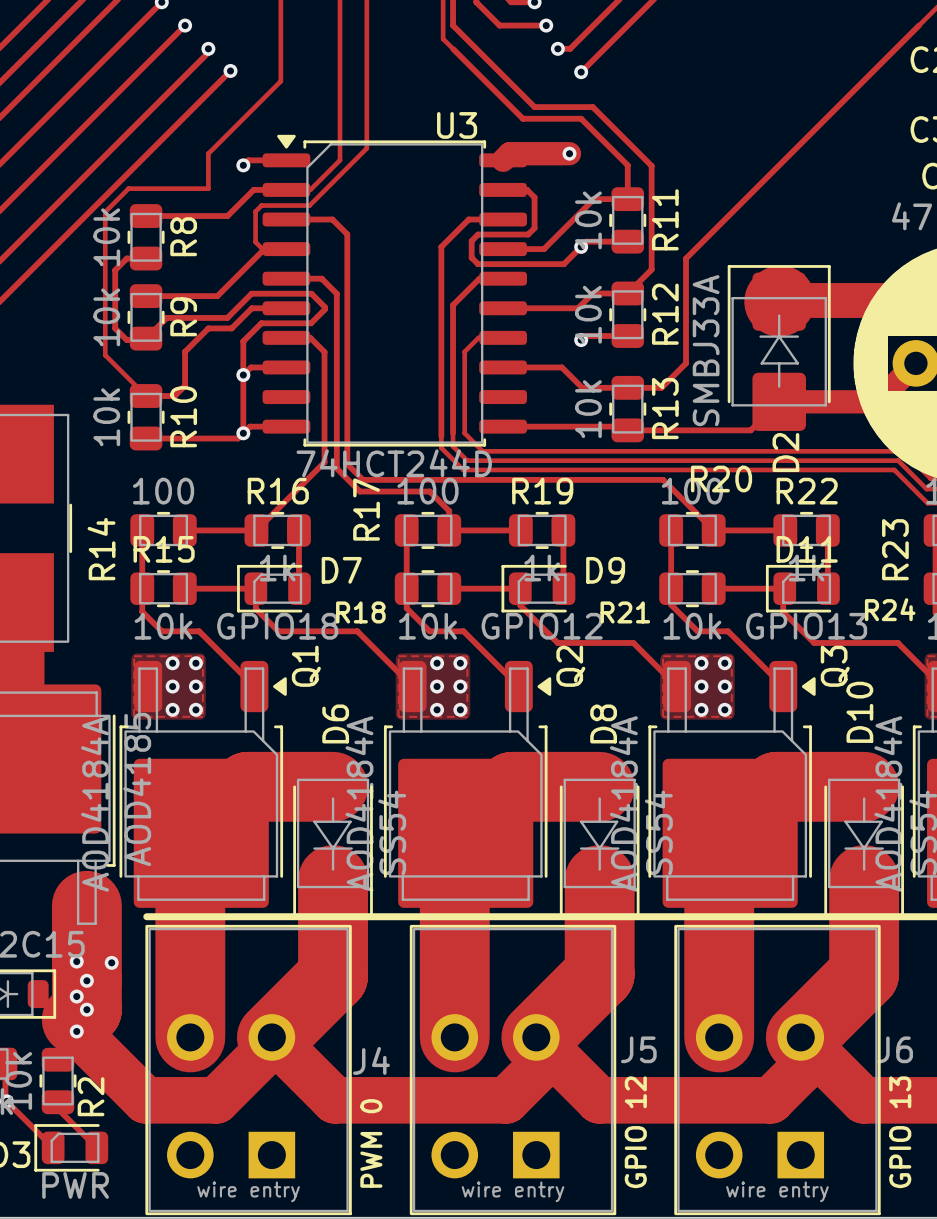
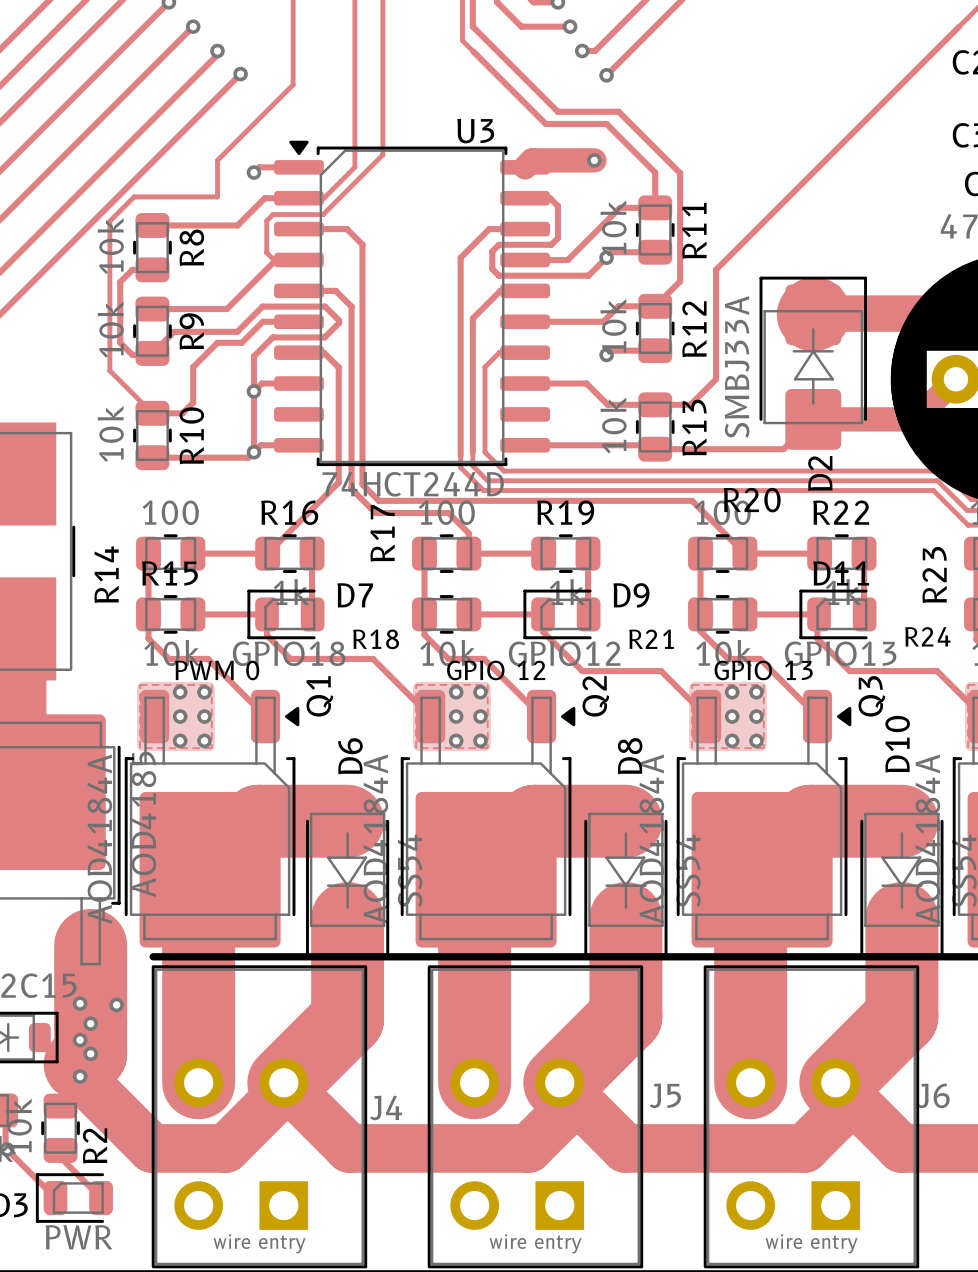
J5 value rotation: 0° (635, 1132) -> 90° clockwise (496, 670)
J5 value position: GPIO 12 (635, 1132) -> GPIO 12 (496, 670)
J6 value rotation: 0° (900, 1132) -> 90° clockwise (763, 670)
J6 value position: GPIO 13 (900, 1132) -> GPIO 13 (763, 670)
J4 value rotation: 0° (371, 1143) -> 90° clockwise (217, 670)
J4 value position: PWM 0 (371, 1143) -> PWM 0 (217, 670)

